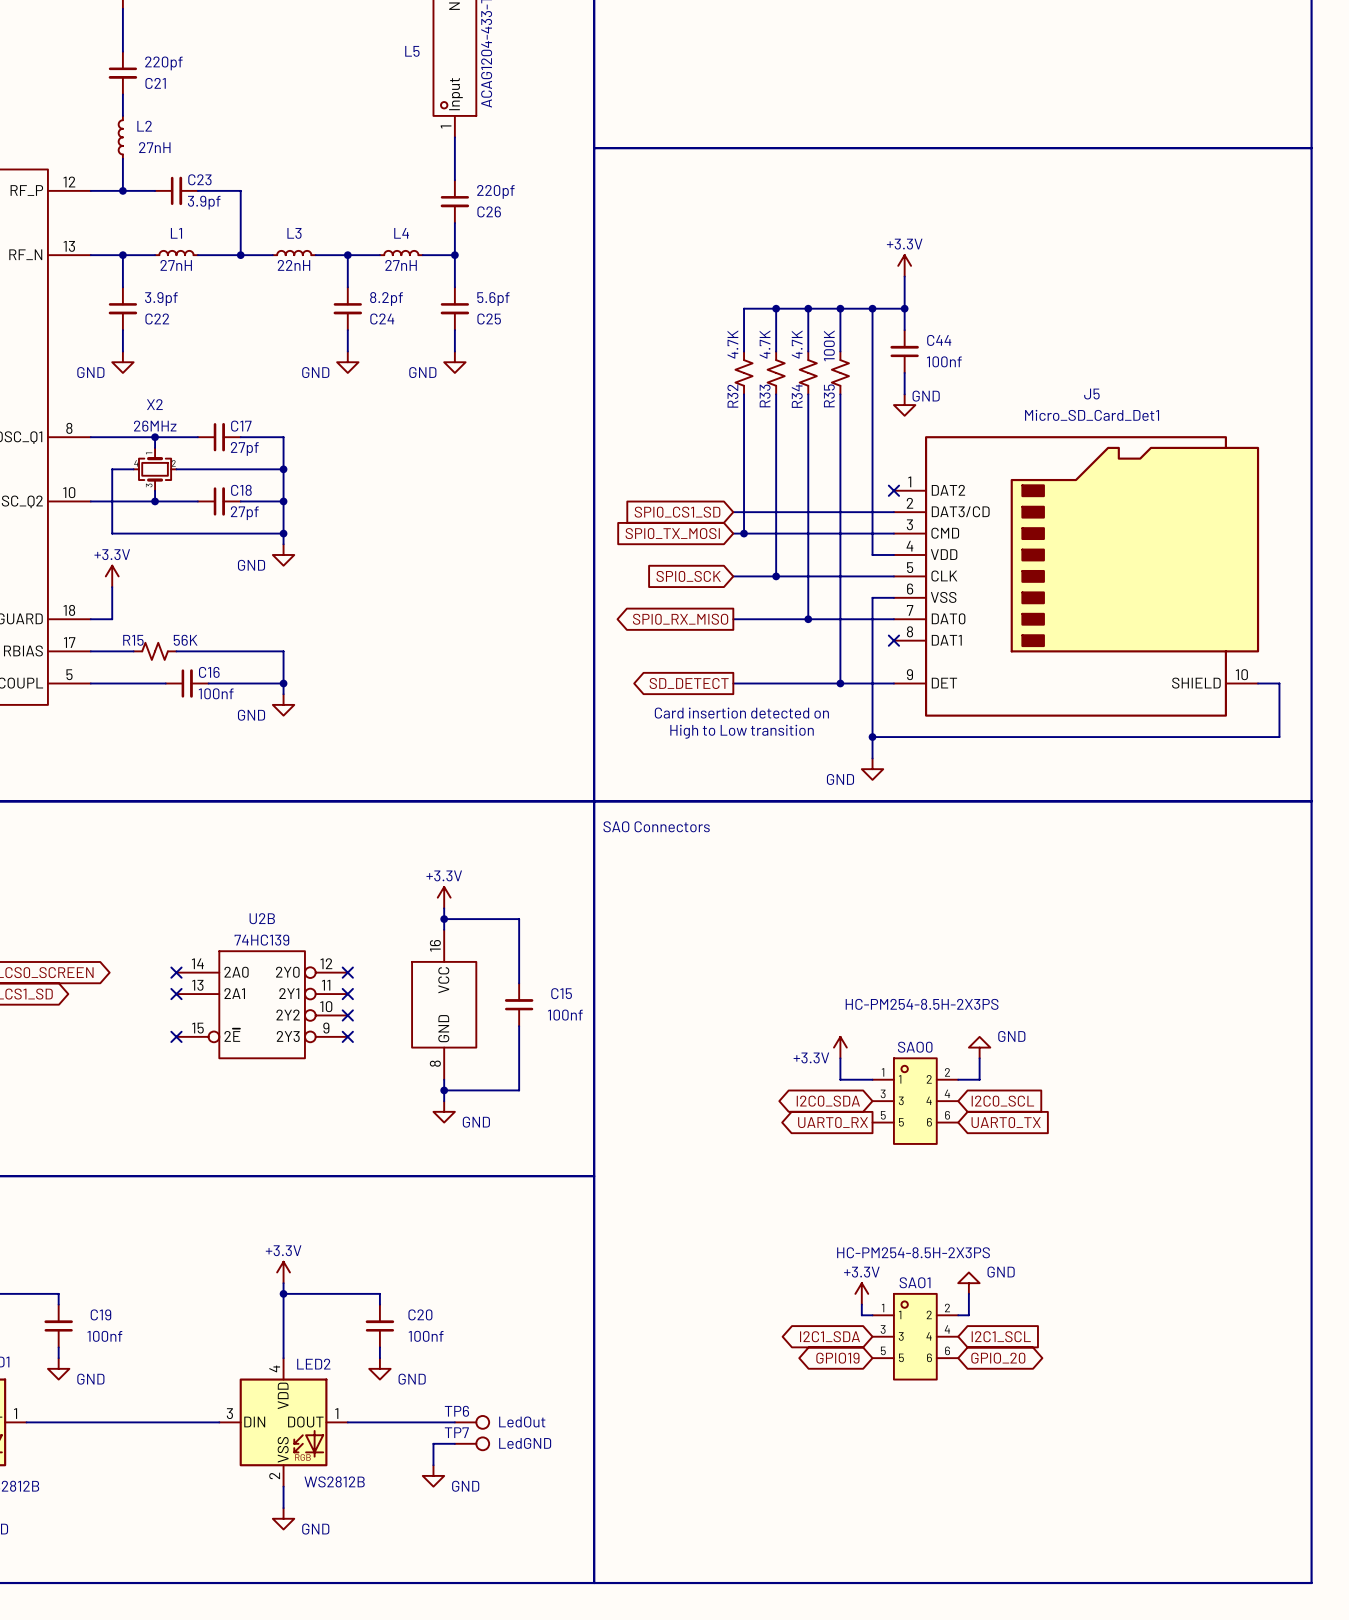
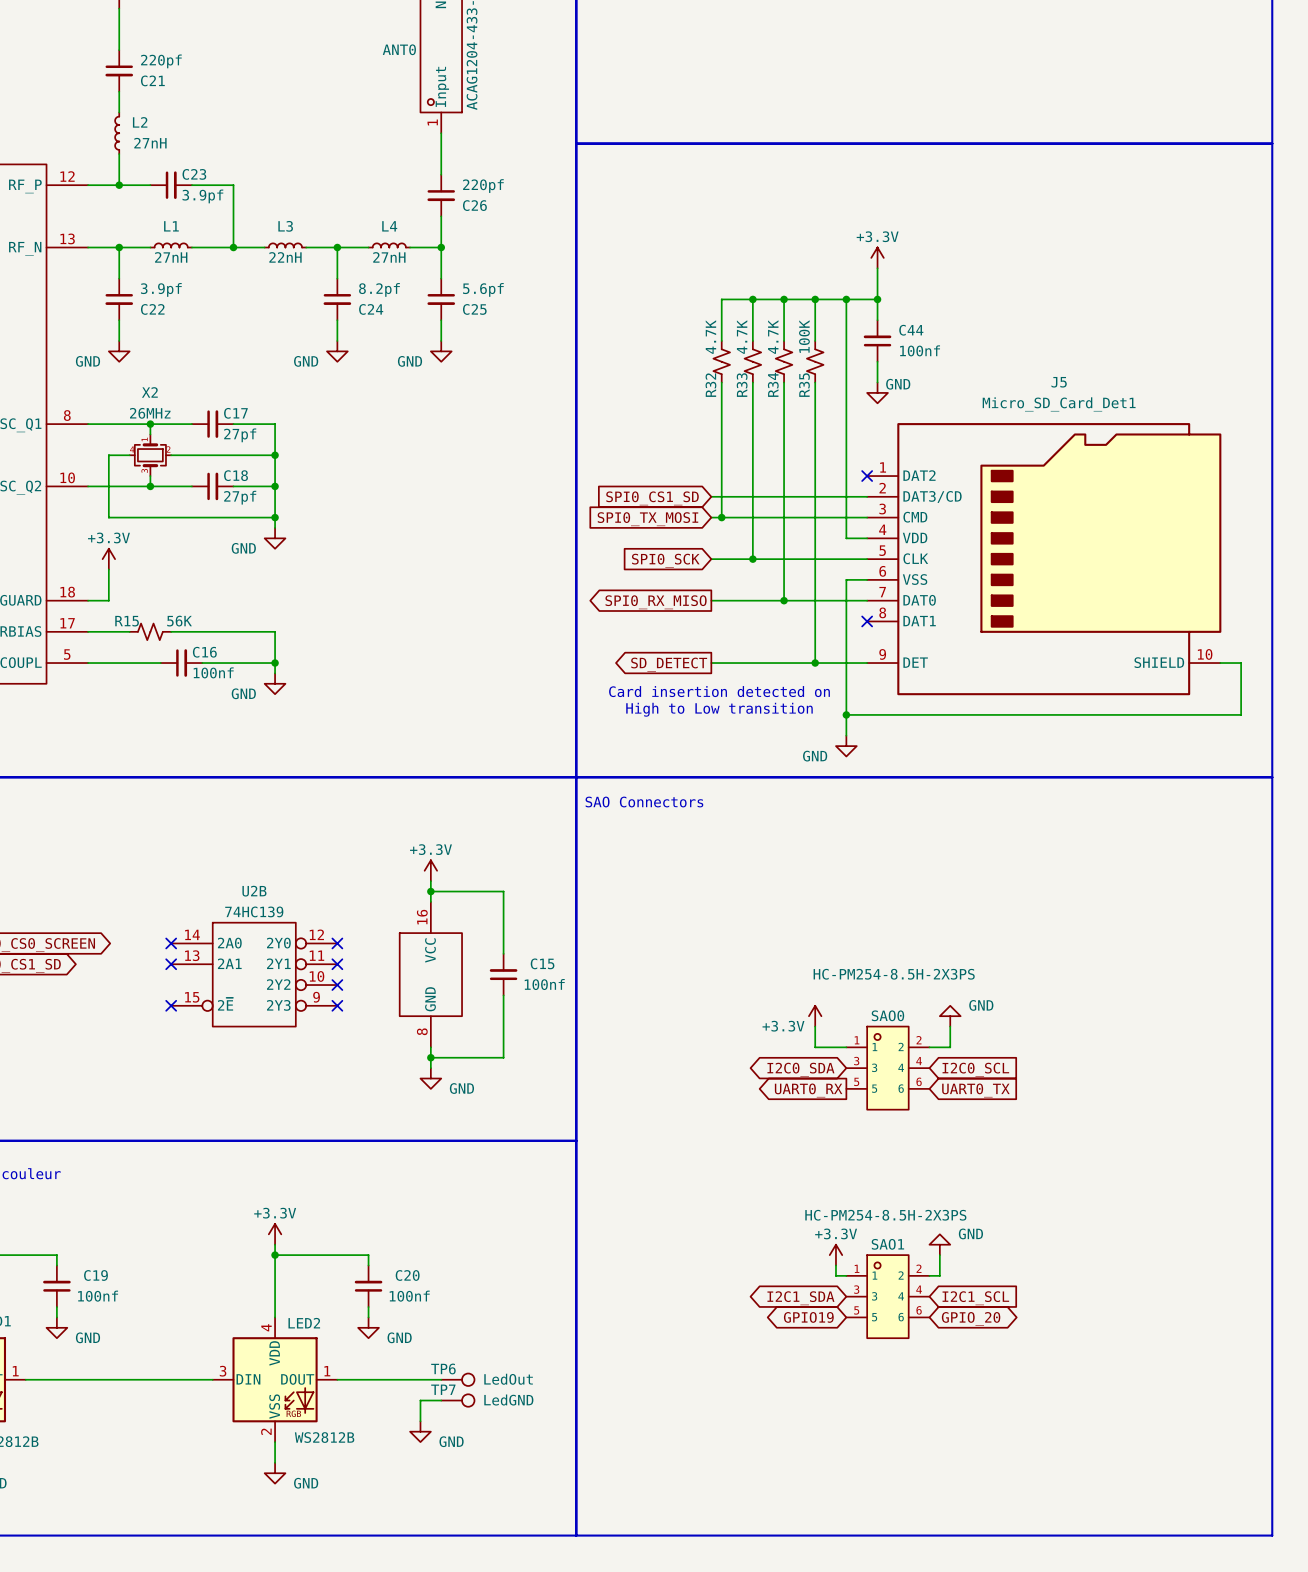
L5 name: L5 (412, 51) -> ANT0 (399, 49)

